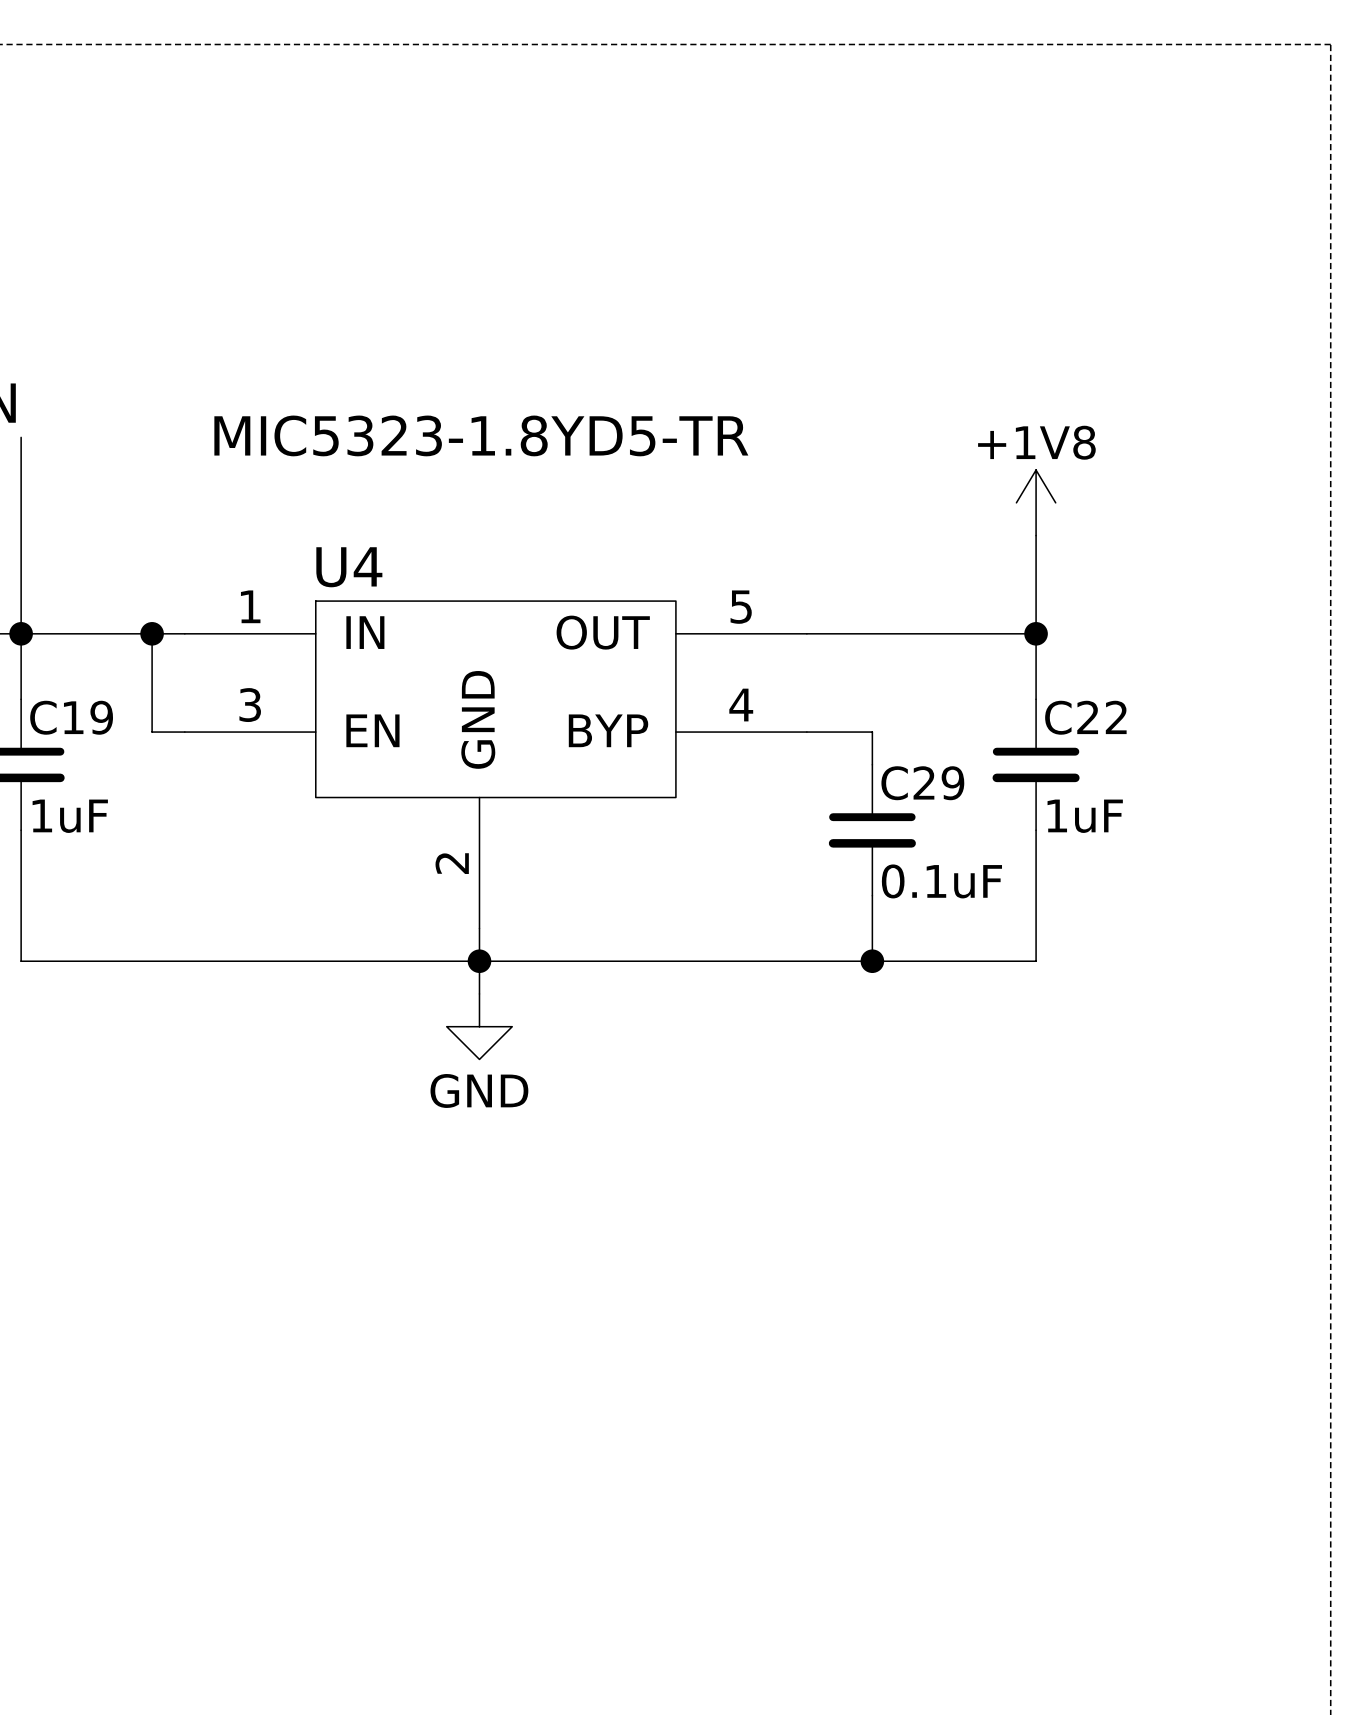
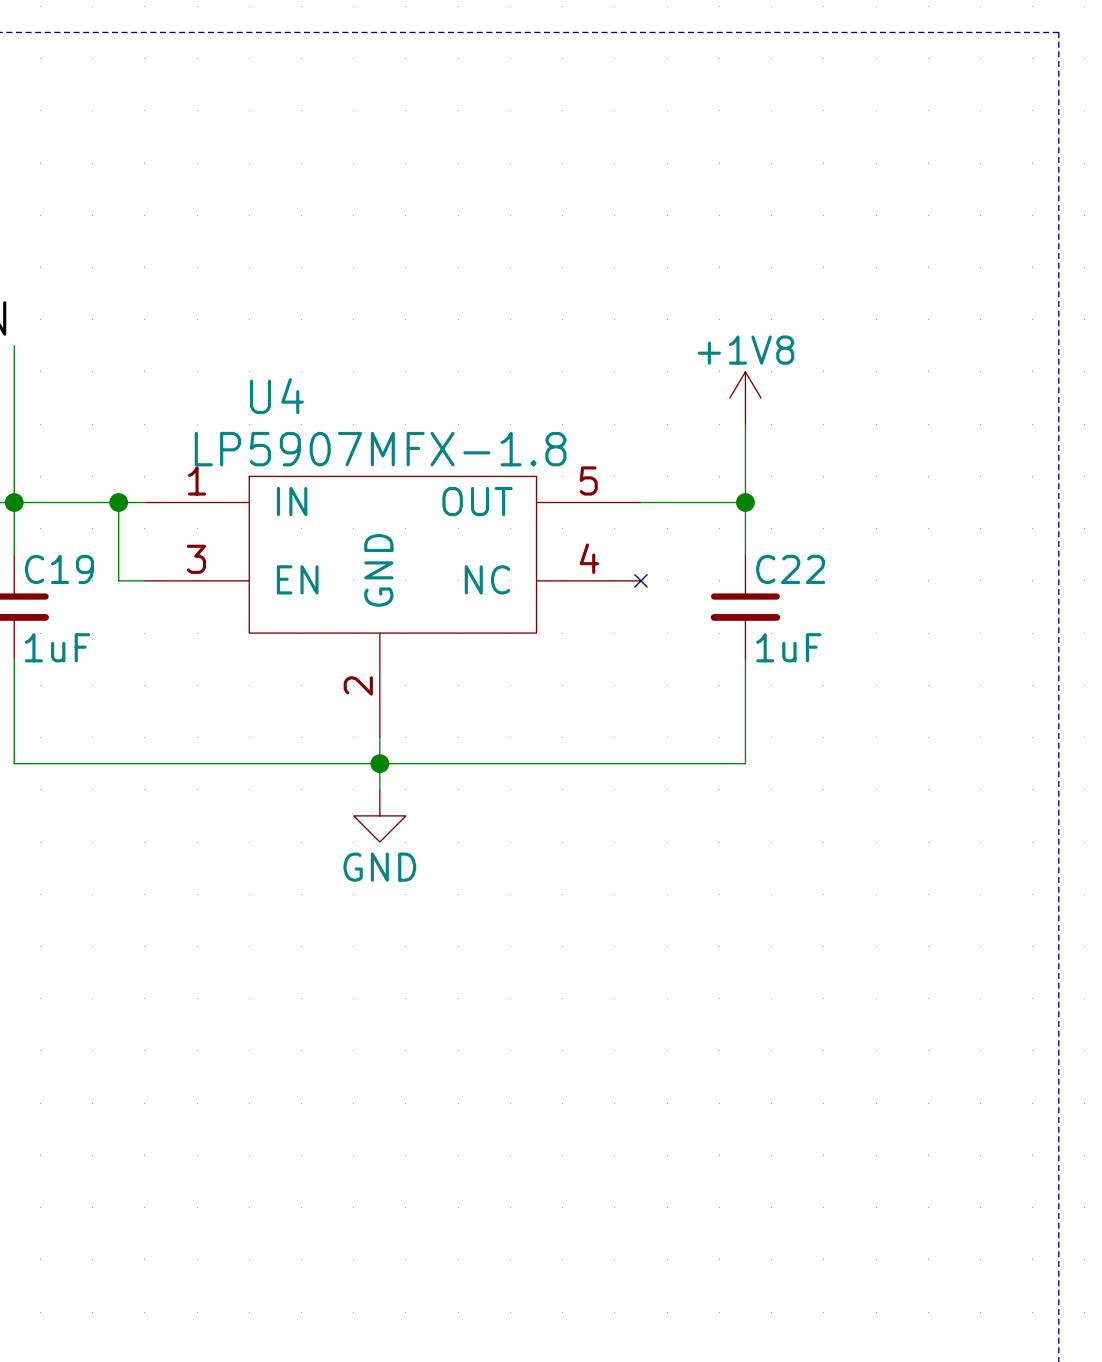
U4 value: MIC5323-1.8YD5-TR (481, 435) -> LP5907MFX-1.8 (380, 449)
power symbol position: +1V8 (1036, 502) -> +1V8 (745, 398)
wire: (1036, 535) (1036, 699) -> (745, 424) (745, 554)
U4 name position: U4 (349, 567) -> U4 (276, 396)
U4 symbol: [184, 601, 807, 929] -> [144, 476, 648, 738]
wire: (937, 633) (1036, 633) -> none
junction position: (1036, 633) -> (745, 502)
wire: (806, 732) (872, 732) (872, 764) -> none
C22 position: (1036, 764) -> (745, 606)
C29: 0.1uF (872, 830) -> none
wire: (1036, 830) (1036, 961) (937, 961) -> (745, 659) (745, 763)
wire: (872, 895) (872, 961) -> none
junction: (872, 961) -> none

